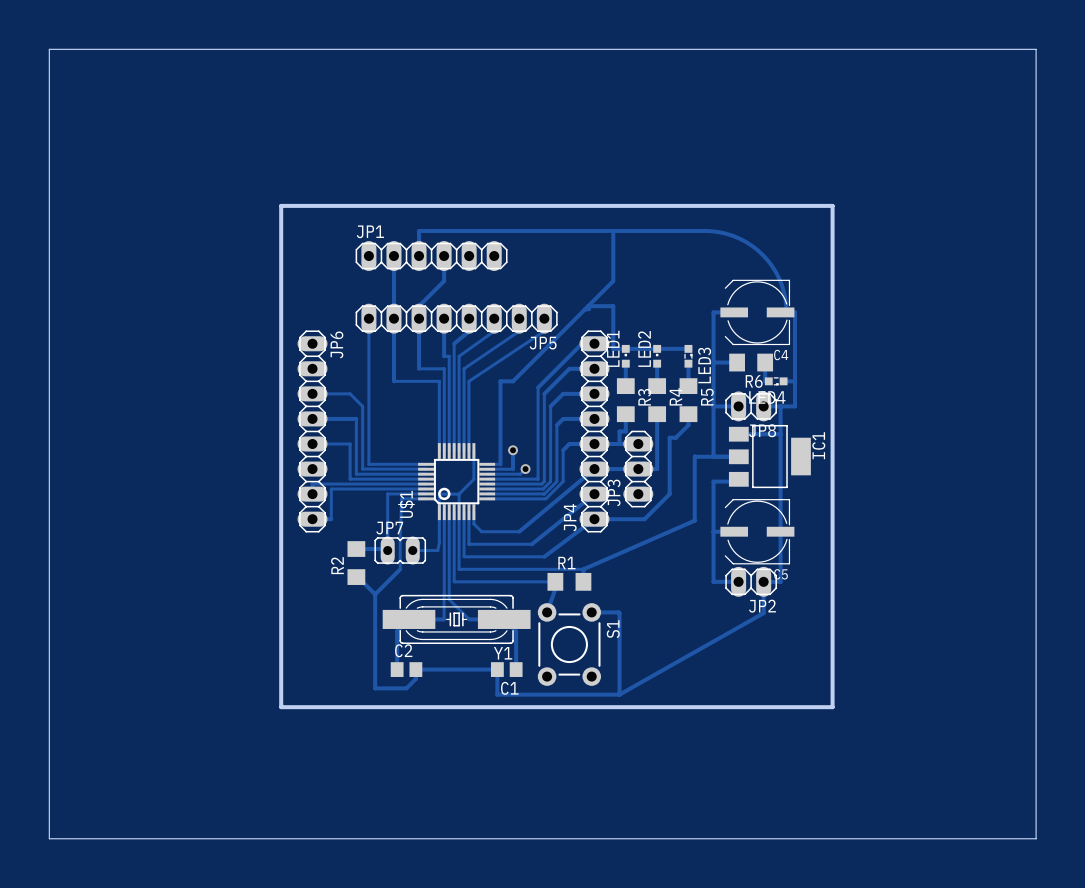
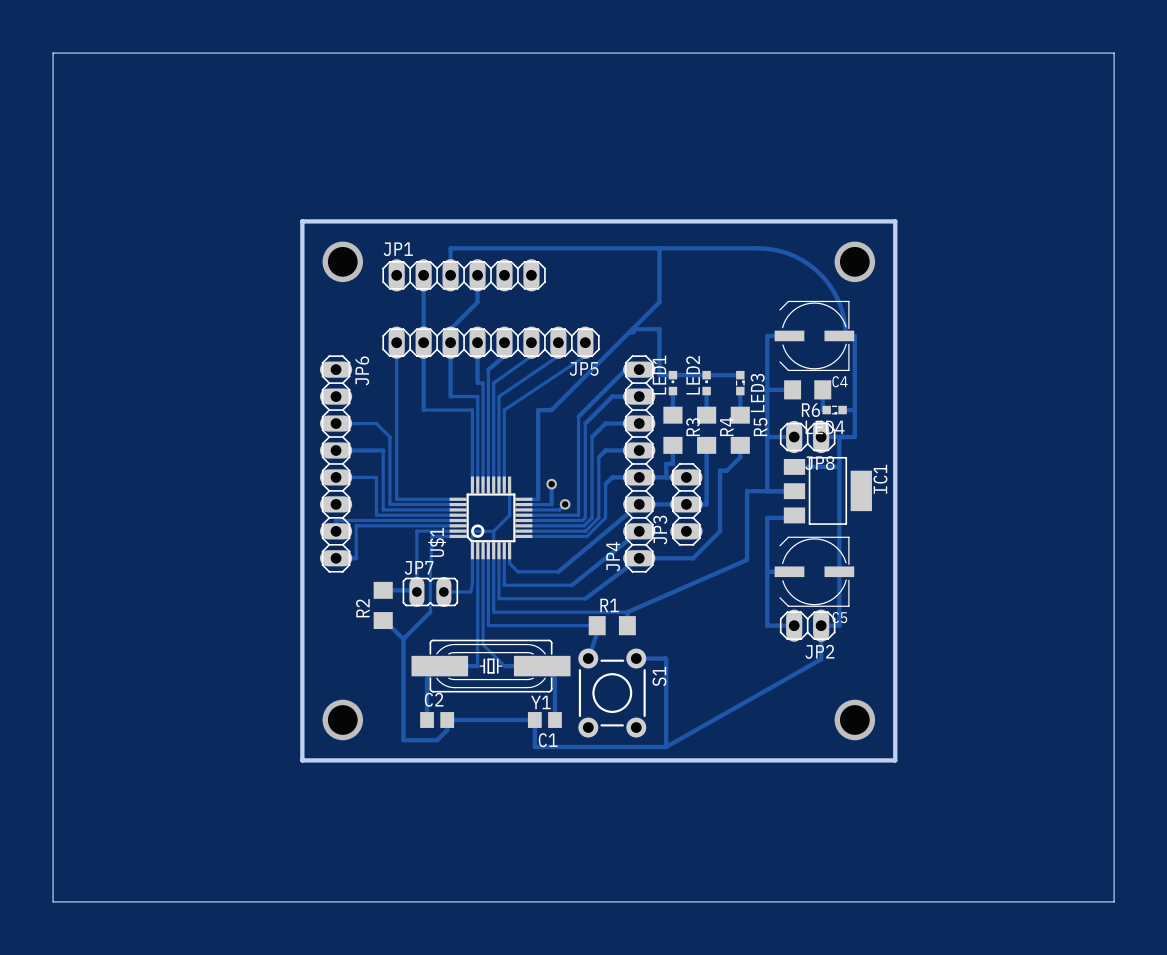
via: none -> (342, 261)
via: none -> (854, 261)
via: none -> (342, 719)
via: none -> (854, 719)

